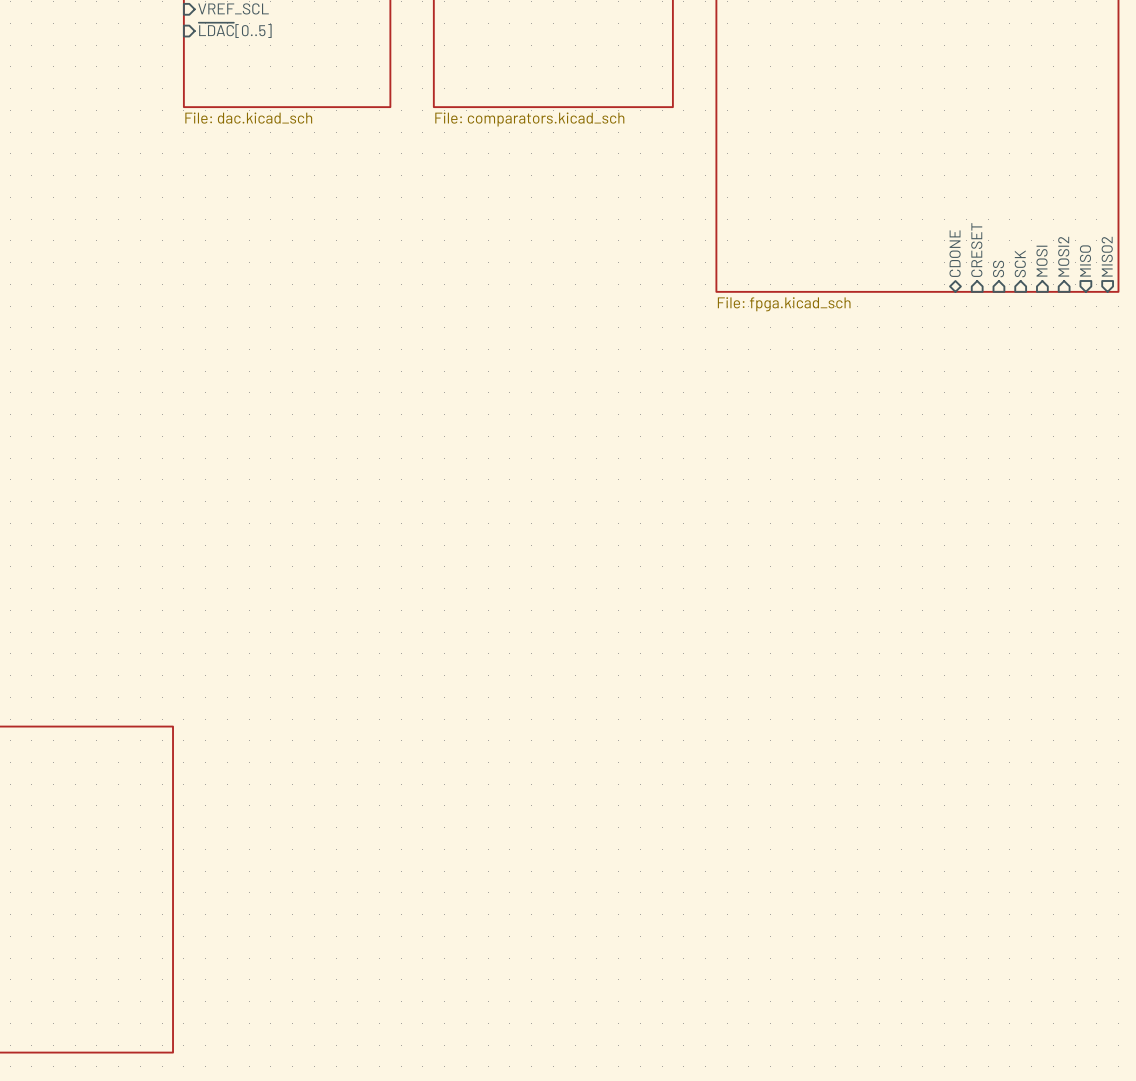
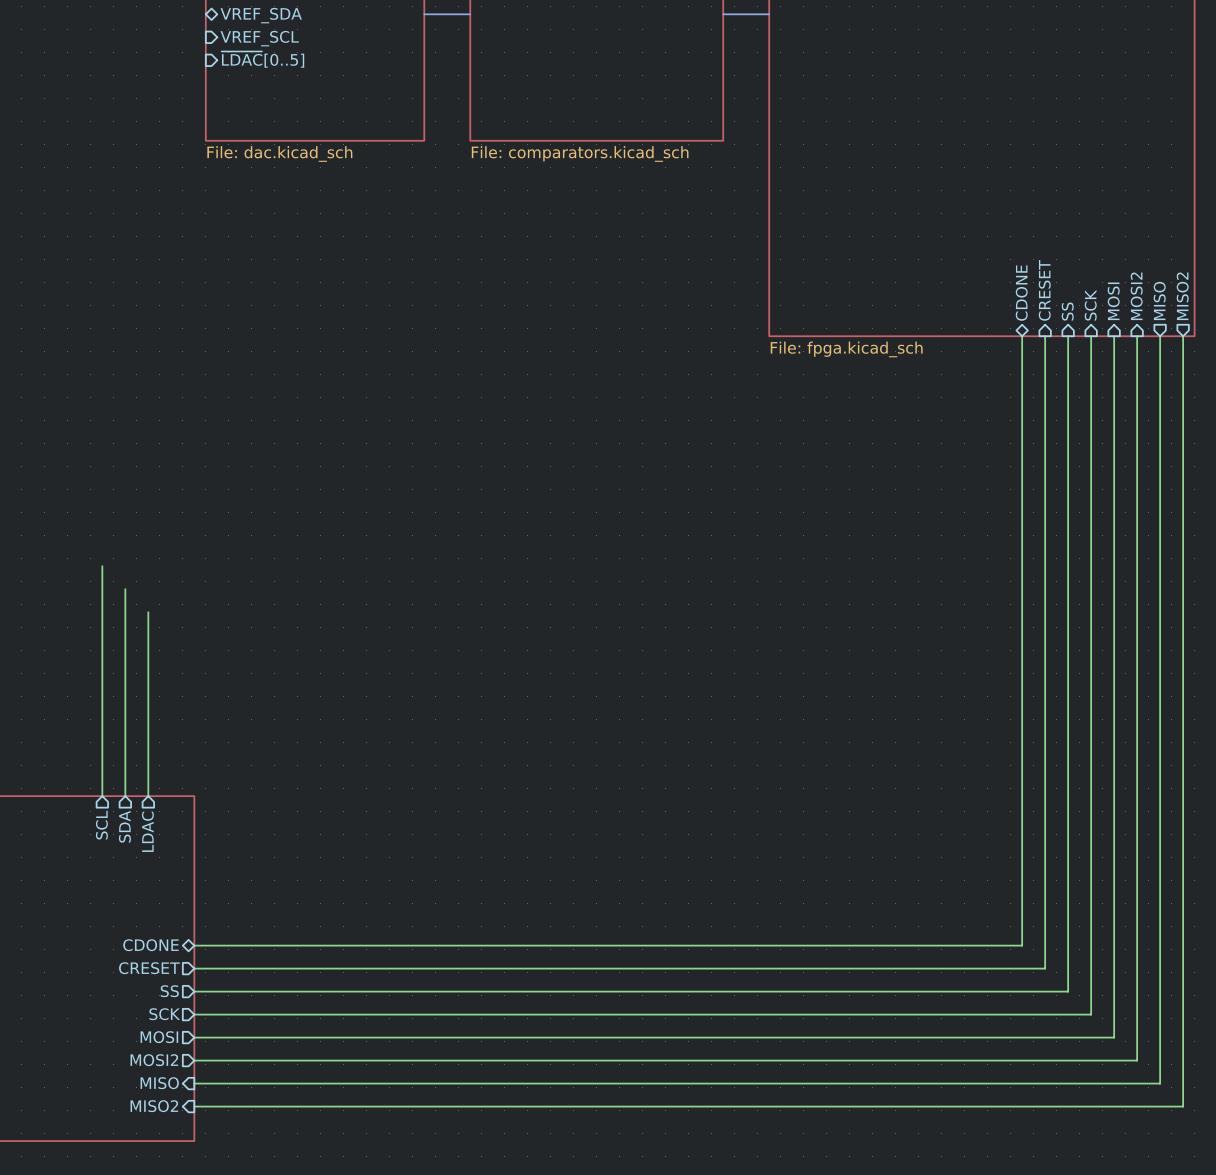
wire: none -> (1022, 336) (1022, 945) (194, 945)
wire: none -> (1045, 336) (1045, 968) (194, 968)
wire: none -> (1068, 336) (1068, 991) (194, 991)
wire: none -> (1091, 336) (1091, 1014) (194, 1014)
wire: none -> (1114, 336) (1114, 1037) (194, 1037)
wire: none -> (1137, 336) (1137, 1060) (194, 1060)
wire: none -> (1160, 336) (1160, 1083) (194, 1083)
wire: none -> (1183, 336) (1183, 1106) (194, 1106)
wire: none -> (102, 566) (102, 796)
wire: none -> (125, 589) (125, 796)
wire: none -> (148, 612) (148, 796)
sheet pin: none -> SCL (101, 825)
sheet pin: none -> SDA (124, 826)
sheet pin: none -> LDAC (147, 831)
sheet pin: none -> CDONE (150, 945)
sheet pin: none -> CRESET (149, 968)
sheet pin: none -> SS (169, 991)
sheet pin: none -> SCK (164, 1014)
sheet pin: none -> MOSI (159, 1037)
sheet pin: none -> MOSI2 (154, 1060)
sheet pin: none -> MISO (159, 1083)
sheet pin: none -> MISO2 (154, 1106)

